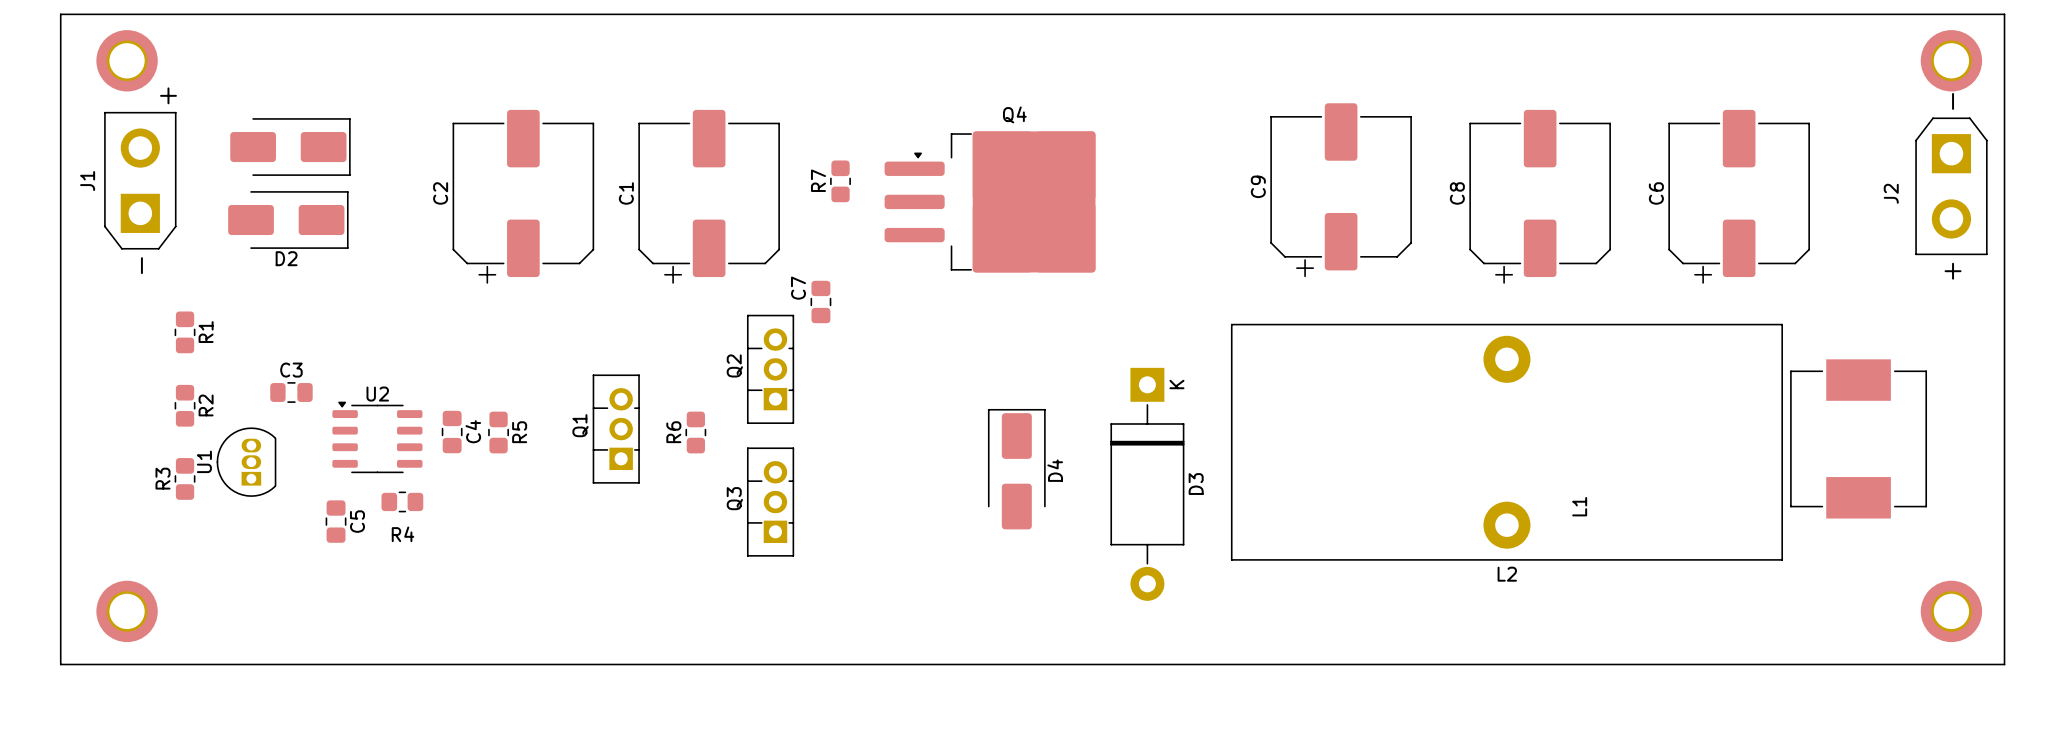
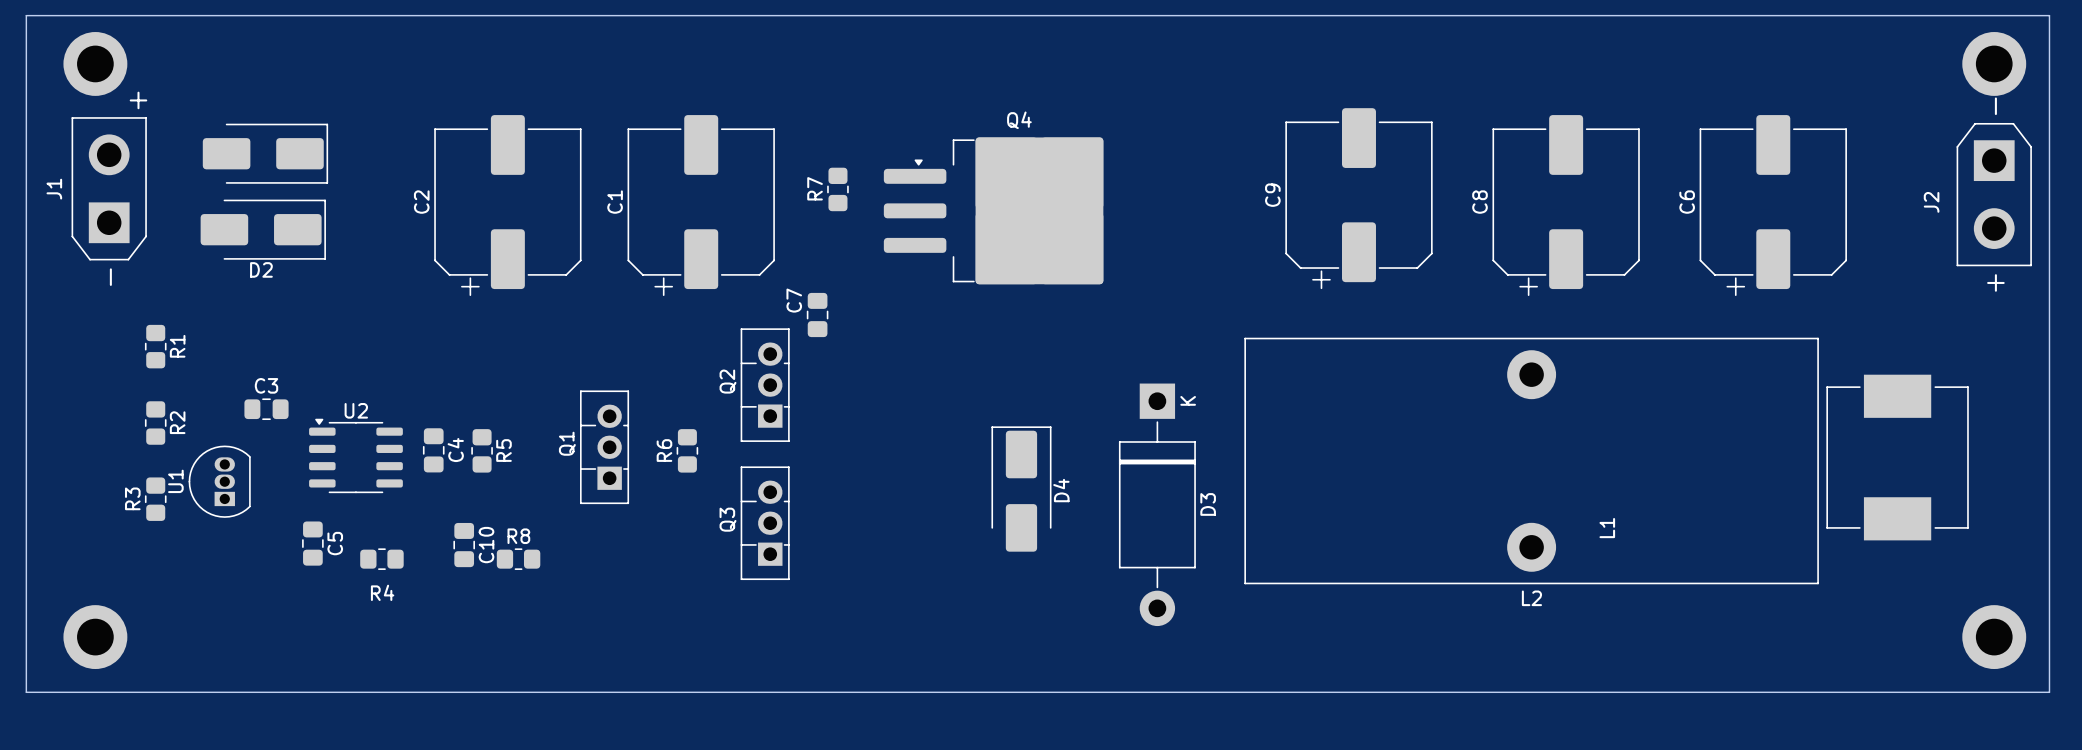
R4 position: (402, 501) -> (381, 559)
C10: none -> (464, 545)
R8: none -> (518, 559)

